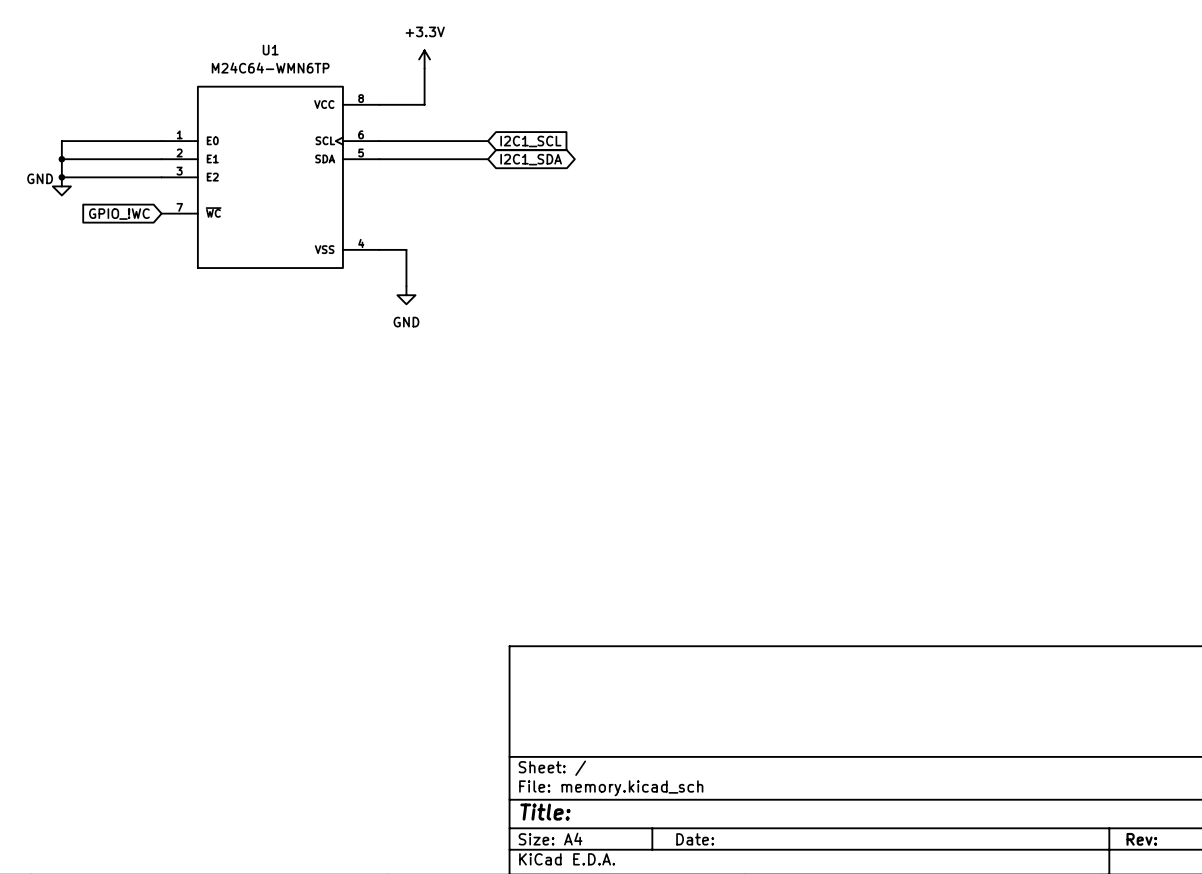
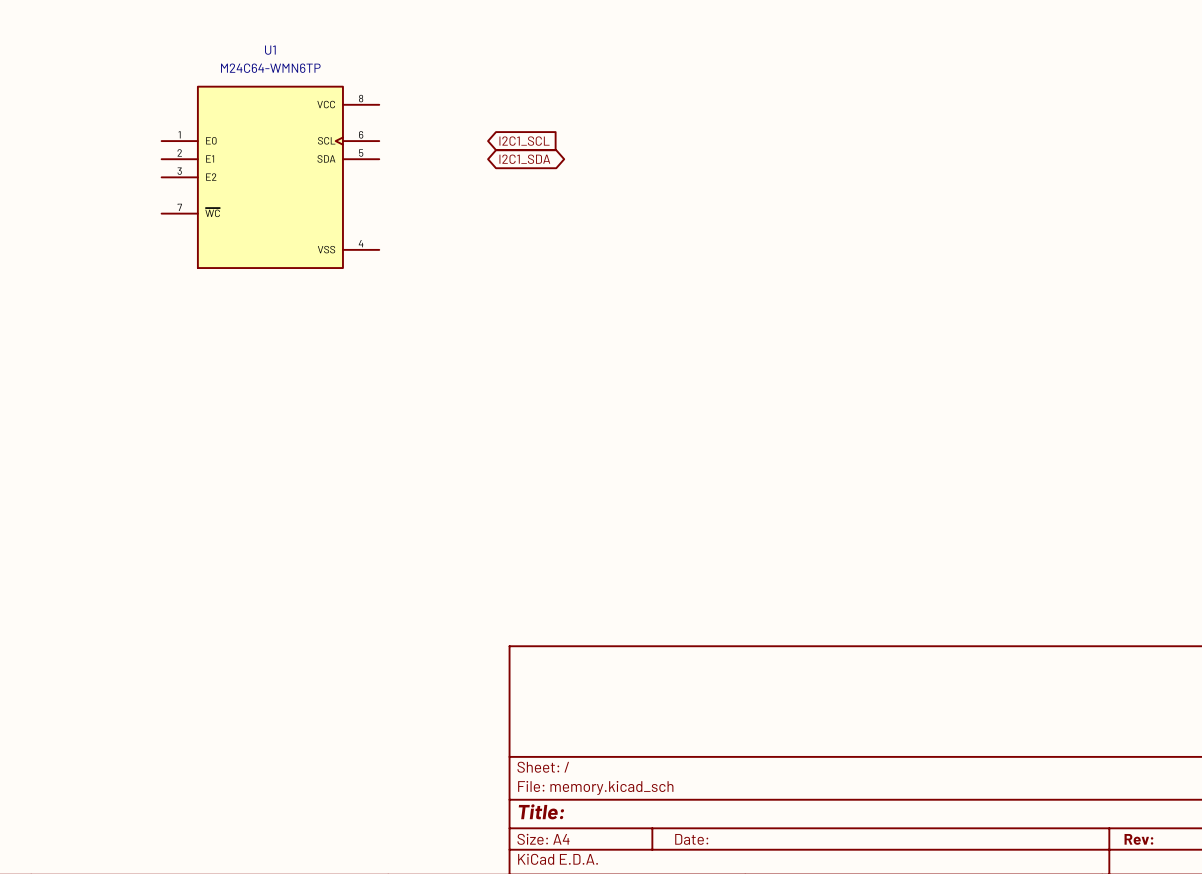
power symbol: +3.3V (424, 59) -> none
wire: (424, 68) (424, 104) (379, 104) -> none
wire: (161, 141) (61, 141) (61, 177) (161, 177) -> none
wire: (379, 141) (488, 141) -> none
wire: (61, 159) (161, 159) -> none
junction: (61, 159) -> none
wire: (379, 159) (488, 159) -> none
junction: (61, 177) -> none
power symbol: GND (61, 186) -> none
global label: GPIO_!WC (119, 214) -> none
wire: (379, 249) (406, 249) (406, 286) -> none
power symbol: GND (406, 295) -> none

